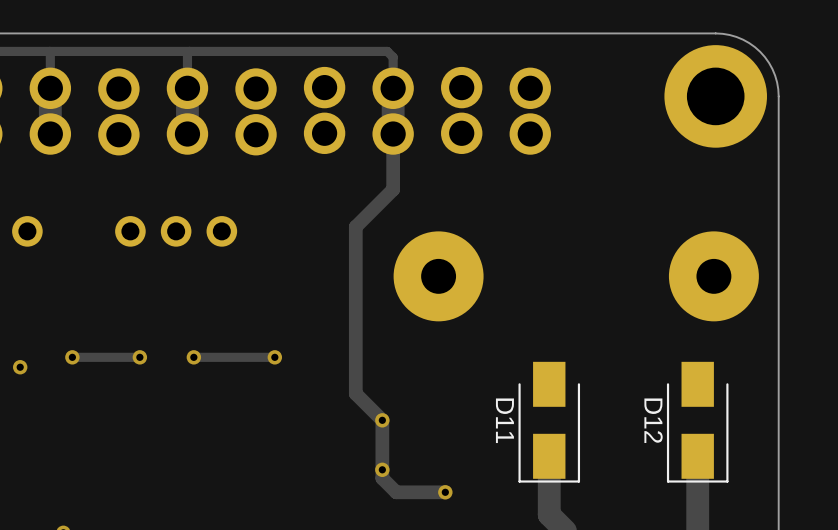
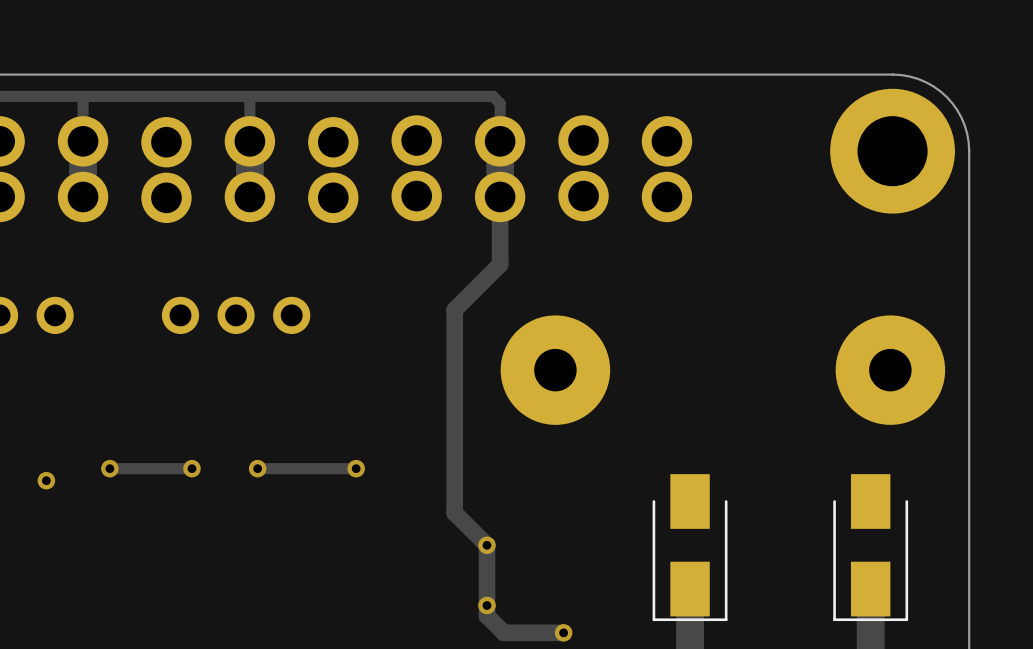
D11 name: D11 (504, 420) -> none
D12 name: D12 (653, 420) -> none

